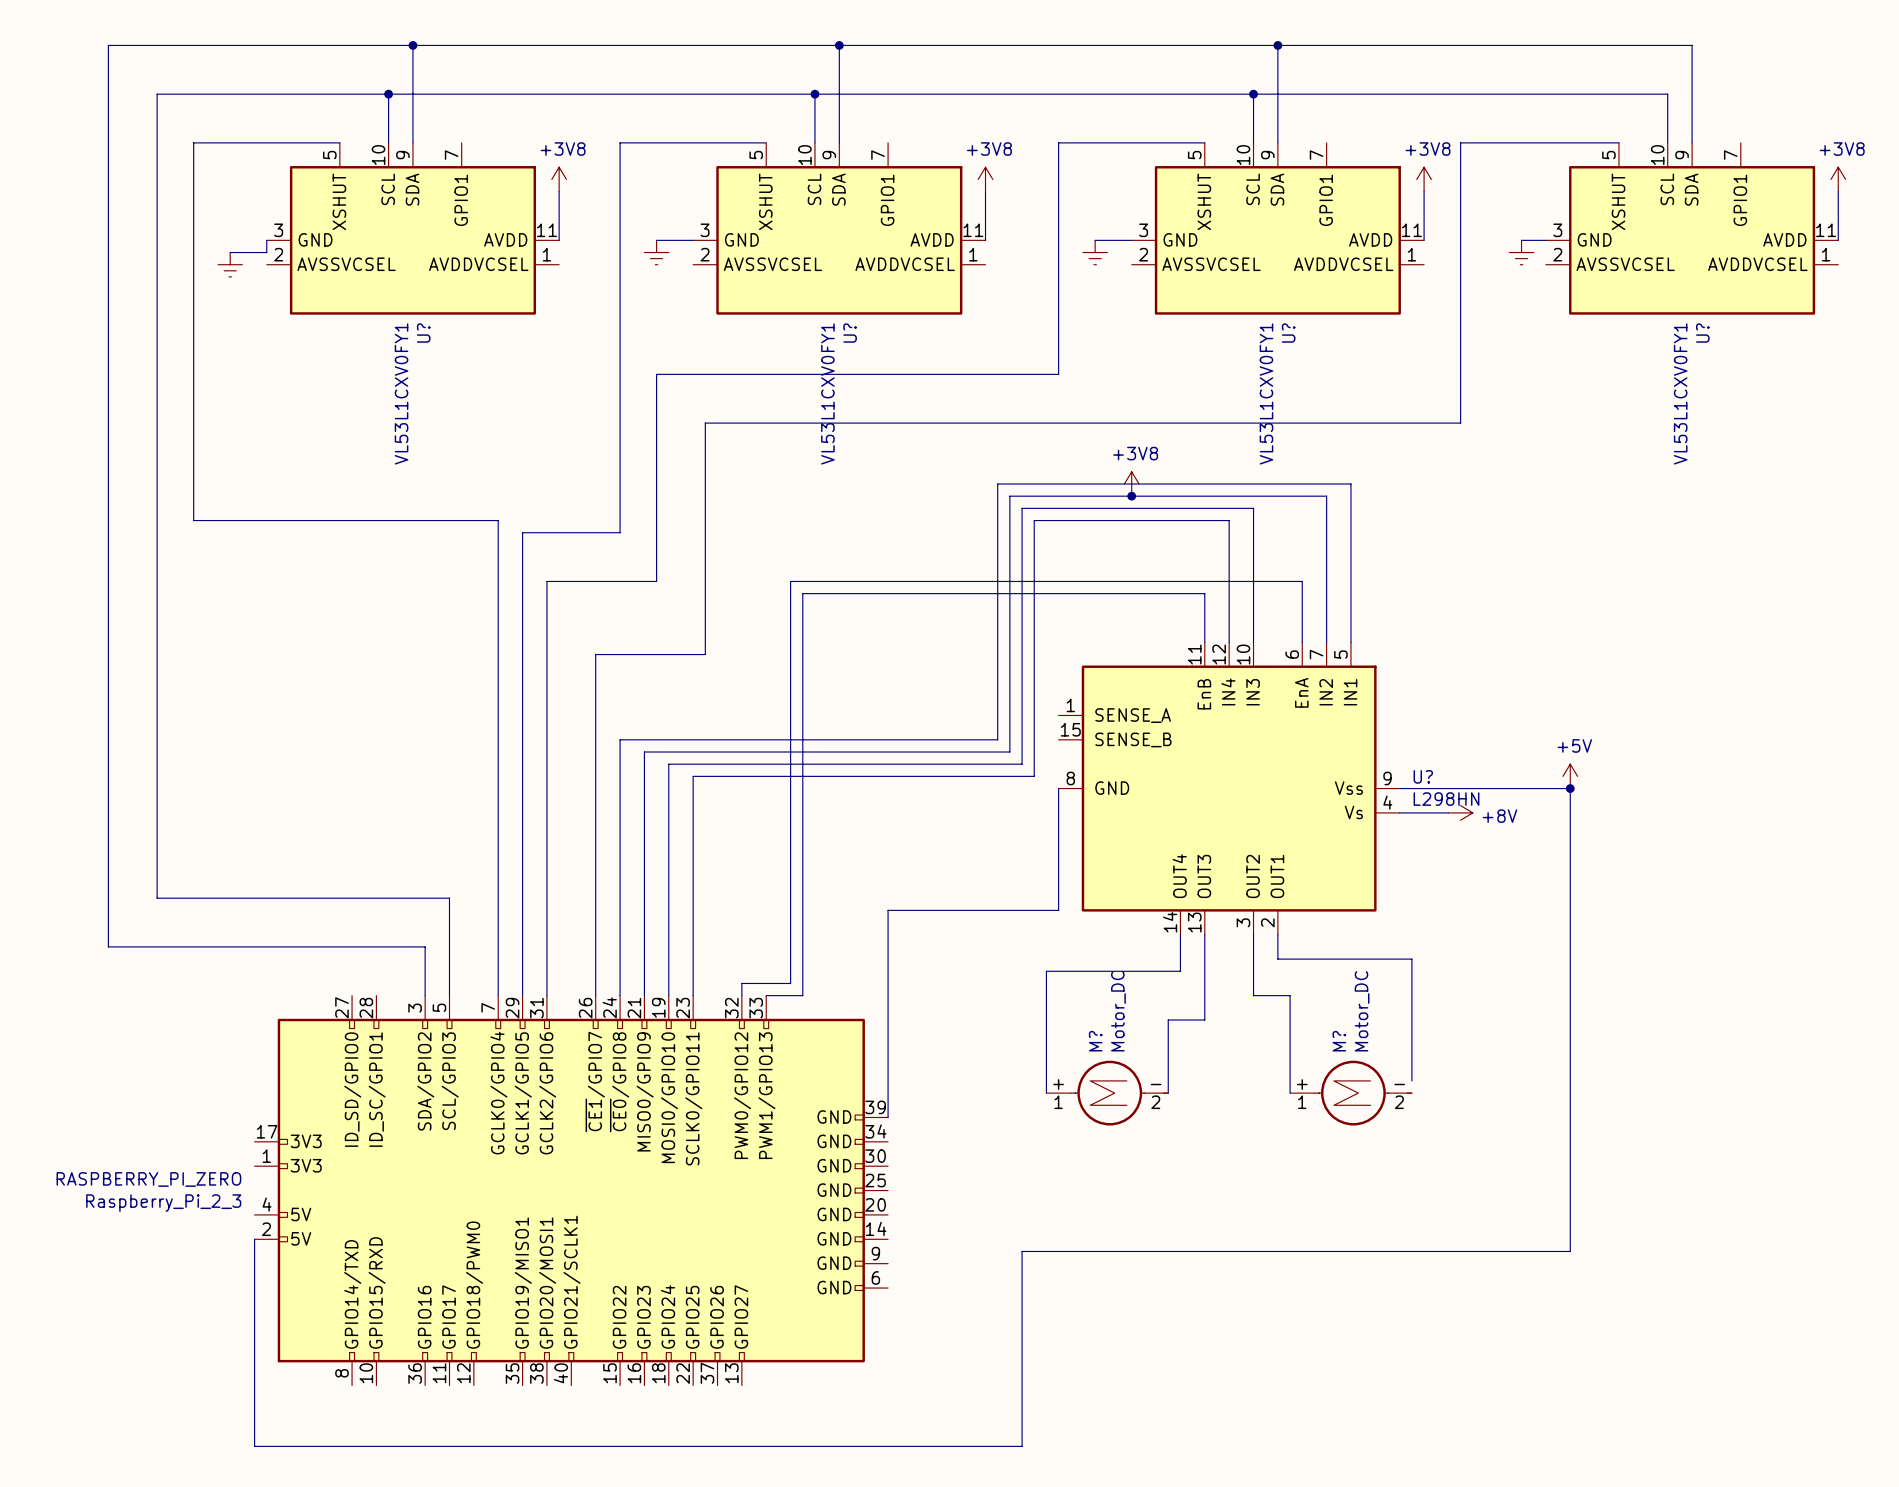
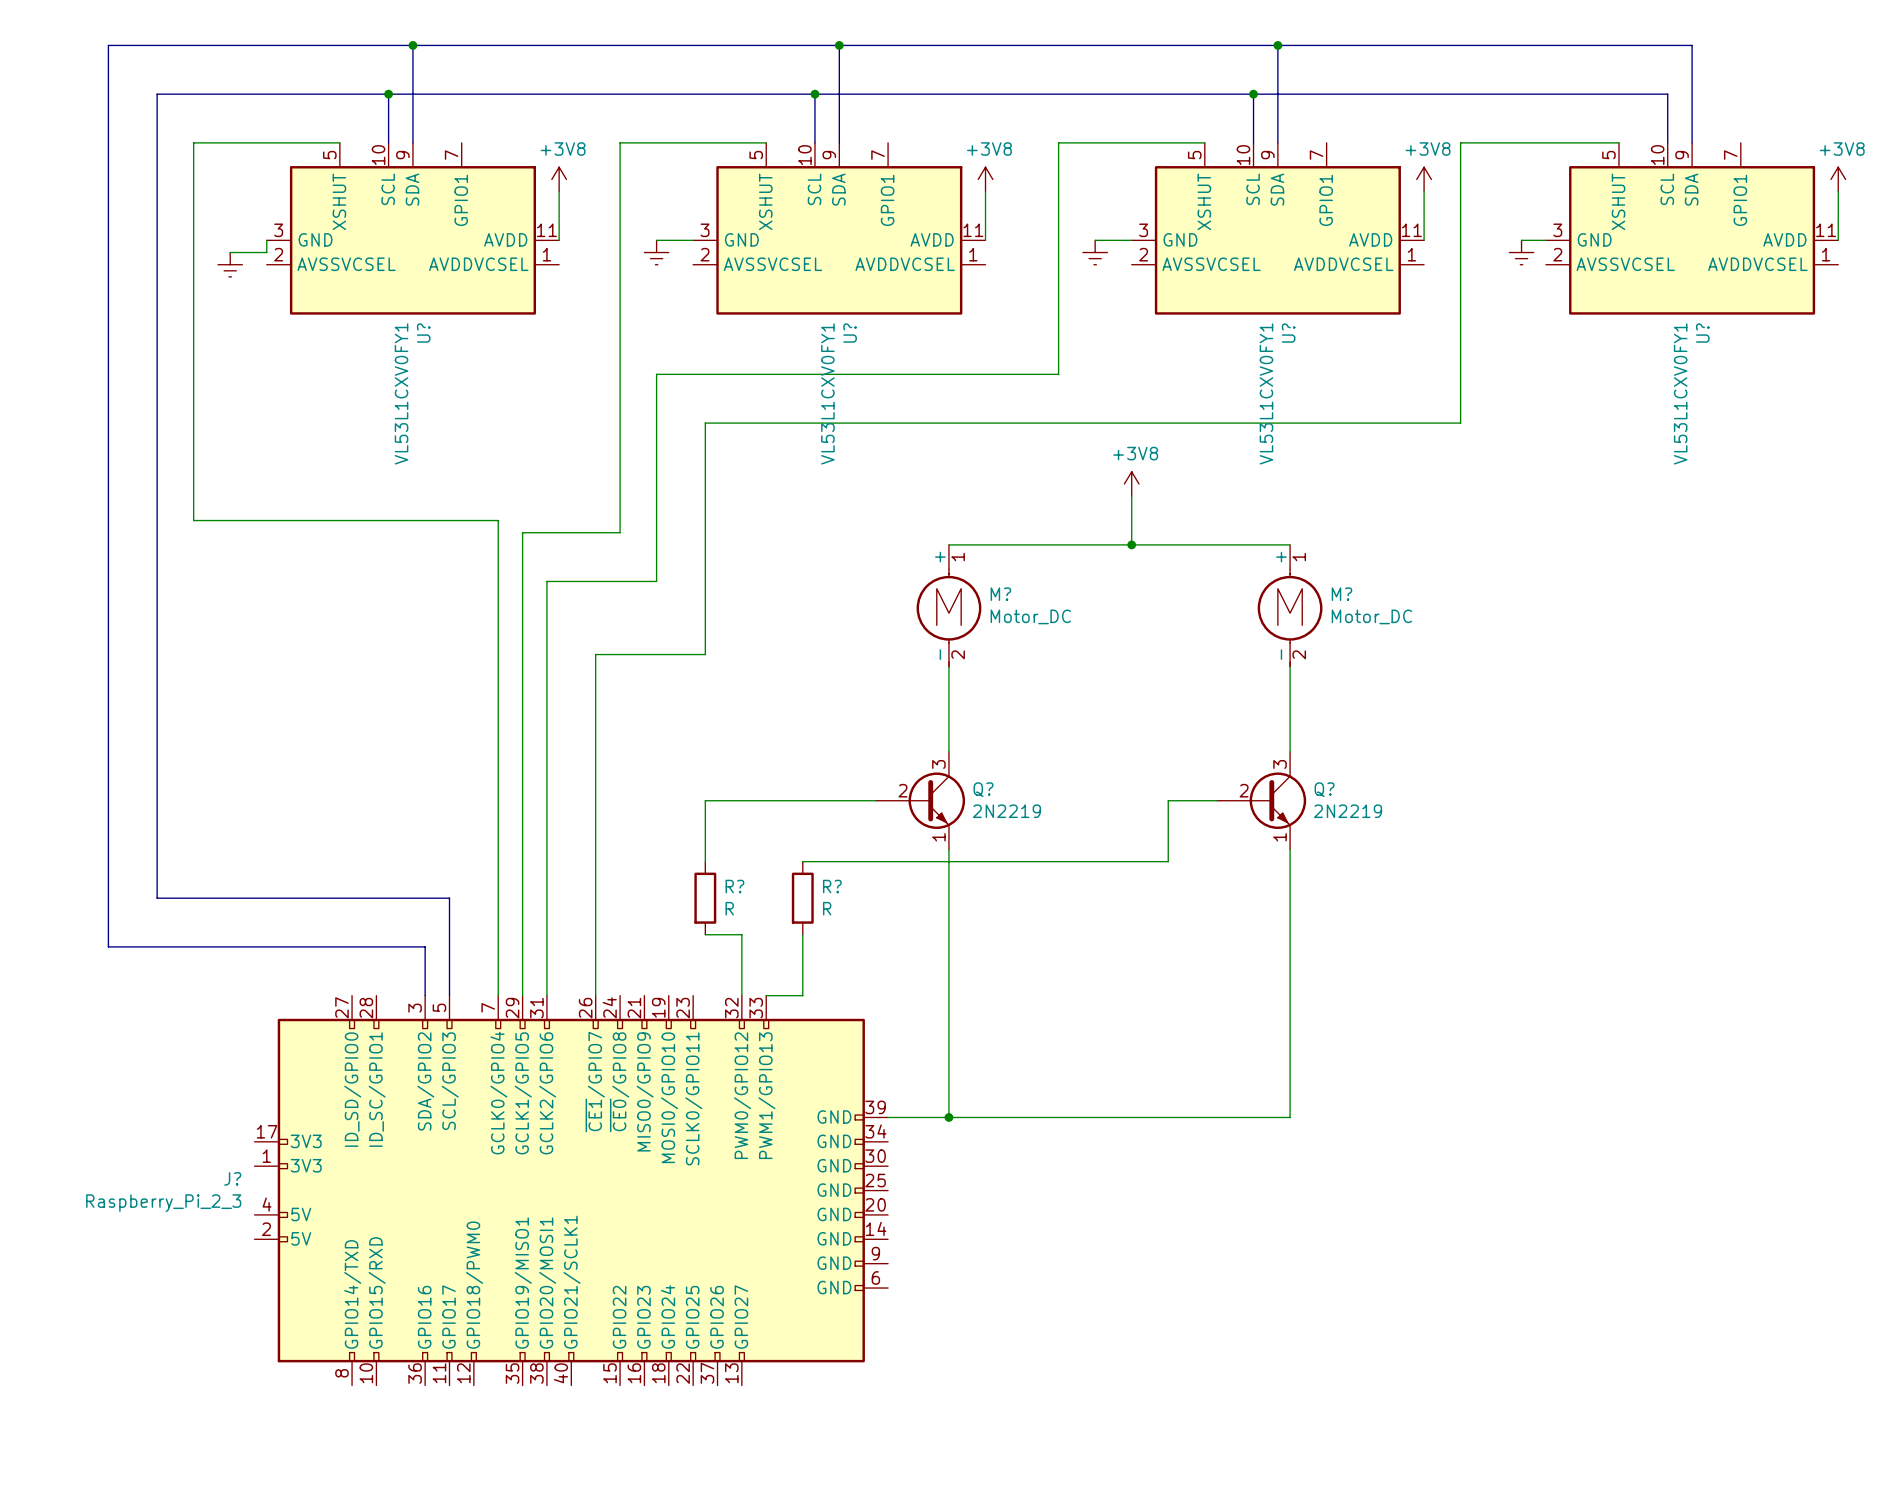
wire: none -> (1131, 496) (1131, 544)
junction position: (1131, 496) -> (1131, 544)
wire: none -> (948, 544) (1290, 544)
M?: none -> Motor_DC (948, 605)
M?: none -> Motor_DC (1290, 605)
wire: (1204, 642) (1204, 593) (802, 593) (802, 934) -> none
wire: (1229, 642) (1229, 520) (1034, 520) (1034, 776) (693, 776) (693, 995) -> none
wire: (1253, 642) (1253, 508) (1022, 508) (1022, 764) (668, 764) (668, 995) -> none
wire: (1302, 642) (1302, 581) (790, 581) (790, 983) (741, 983) -> (705, 934) (741, 934) (741, 983)
wire: (1326, 642) (1326, 496) (1009, 496) (1009, 752) (644, 752) (644, 995) -> none
wire: (1350, 642) (1350, 484) (997, 484) (997, 739) (620, 739) (620, 995) -> none
wire: none -> (948, 666) (948, 752)
power symbol: +5V (1570, 776) -> none
wire: (1058, 788) (1058, 910) (888, 910) (888, 1117) -> (1290, 1093) (1290, 1117) (888, 1117)
U?: L298HN (1229, 788) -> none
wire: (1399, 788) (1570, 788) (1570, 1251) (1022, 1251) (1022, 1446) (254, 1446) (254, 1239) -> none
junction: (1570, 788) -> none
wire: none -> (875, 800) (705, 800) (705, 861)
Q?: none -> 2N2219 (920, 800)
wire: none -> (1216, 800) (1168, 800) (1168, 861) (802, 861)
Q?: none -> 2N2219 (1261, 800)
wire: (1399, 812) (1448, 812) -> none
power symbol: +8V (1460, 812) -> none
wire: none -> (948, 849) (948, 1117)
R?: none -> R (705, 898)
R?: none -> R (802, 898)
wire: (1180, 934) (1180, 971) (1046, 971) (1046, 1093) -> none
wire: (1204, 934) (1204, 1020) (1168, 1020) (1168, 1093) -> none
wire: (1253, 934) (1253, 995) (1290, 995) -> (1290, 849) (1290, 995)
wire: (1277, 934) (1277, 959) (1411, 959) (1411, 1080) -> none
M?: Motor_DC (1107, 1093) -> none
M?: Motor_DC (1350, 1093) -> none
junction: none -> (948, 1117)
RASPBERRY_PI_ZERO name: RASPBERRY_PI_ZERO (148, 1179) -> J? (232, 1178)

